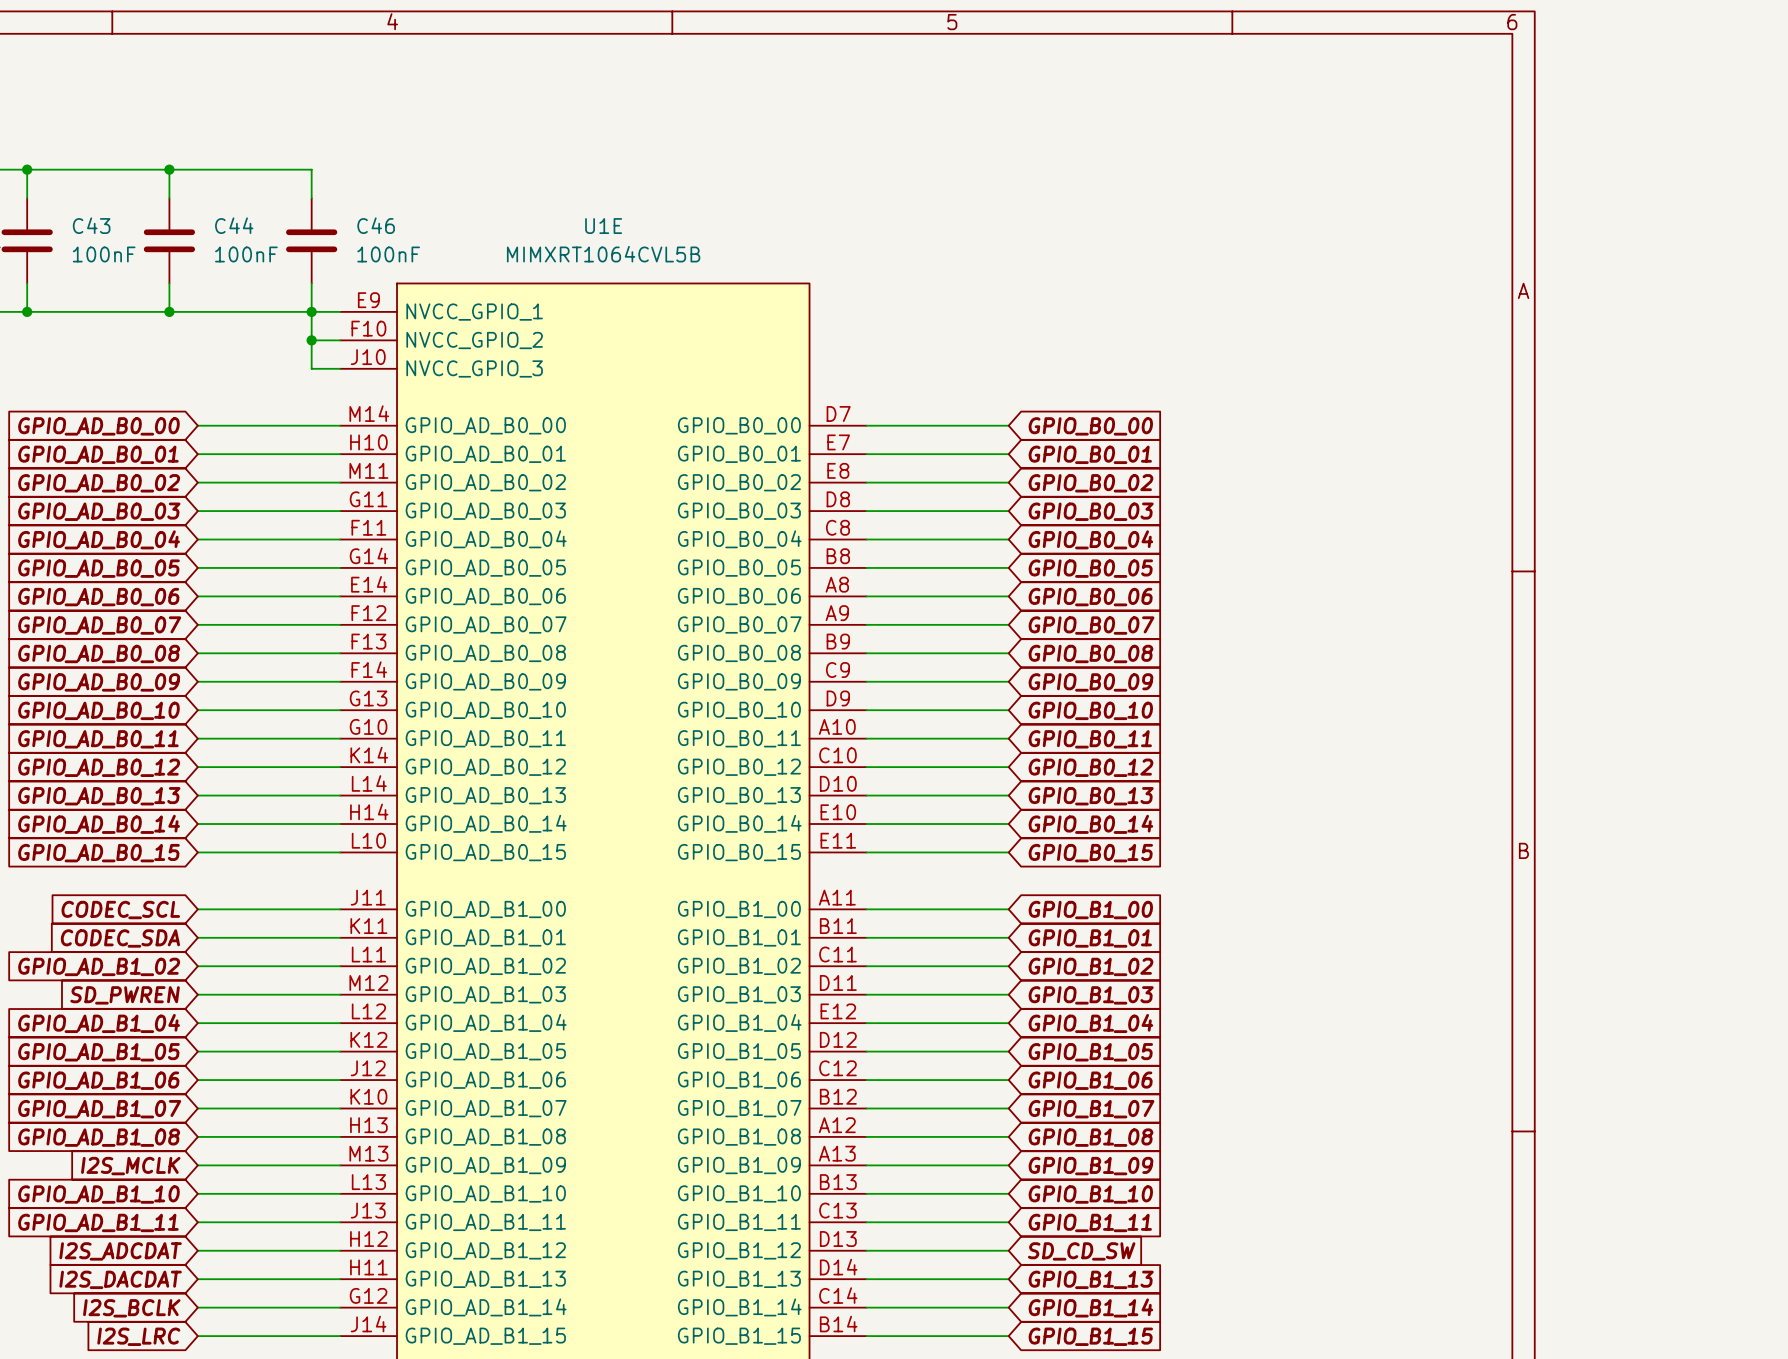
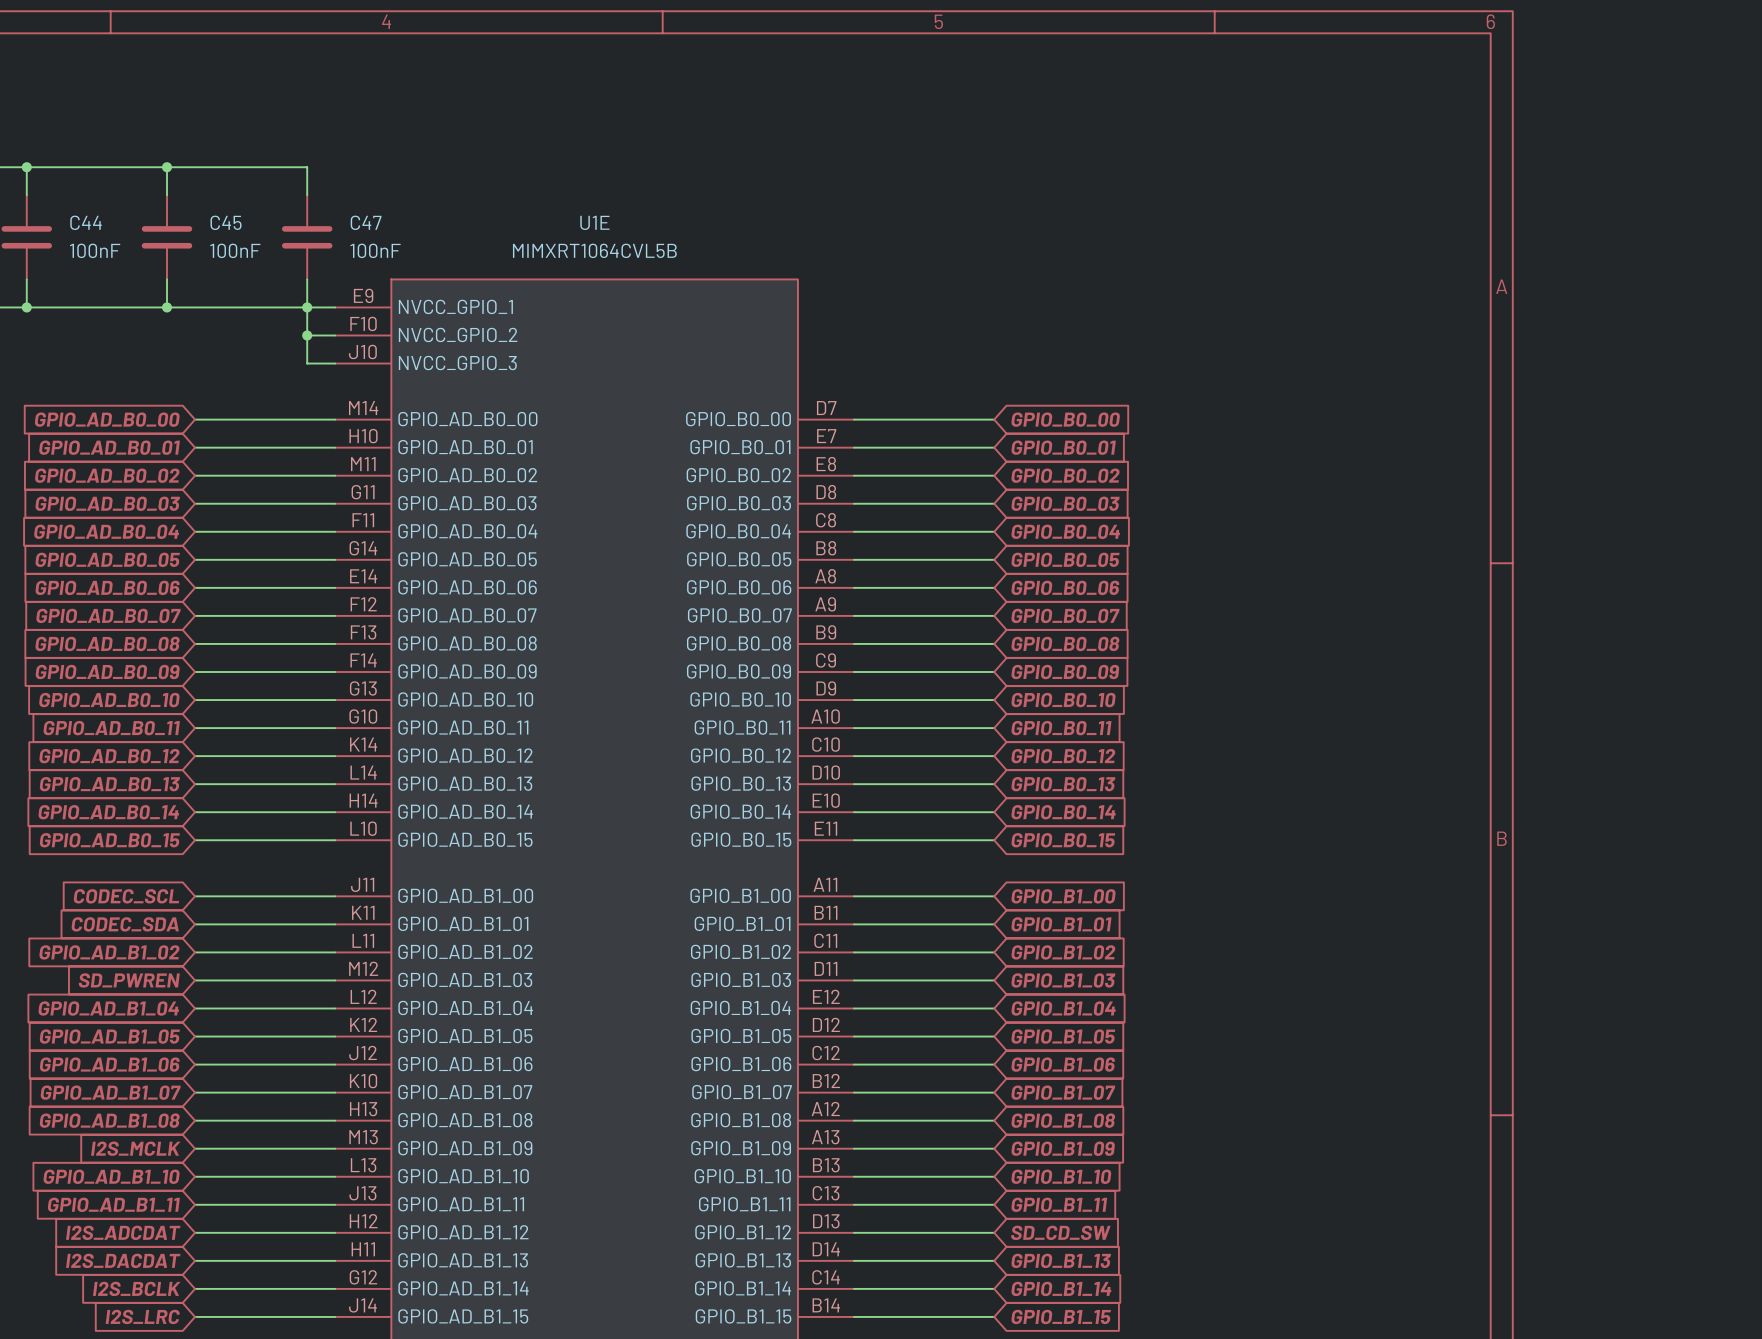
C43 name: C43 (91, 225) -> C44 (86, 222)
C44 name: C44 (234, 225) -> C45 (226, 222)
C46 name: C46 (376, 225) -> C47 (366, 222)

